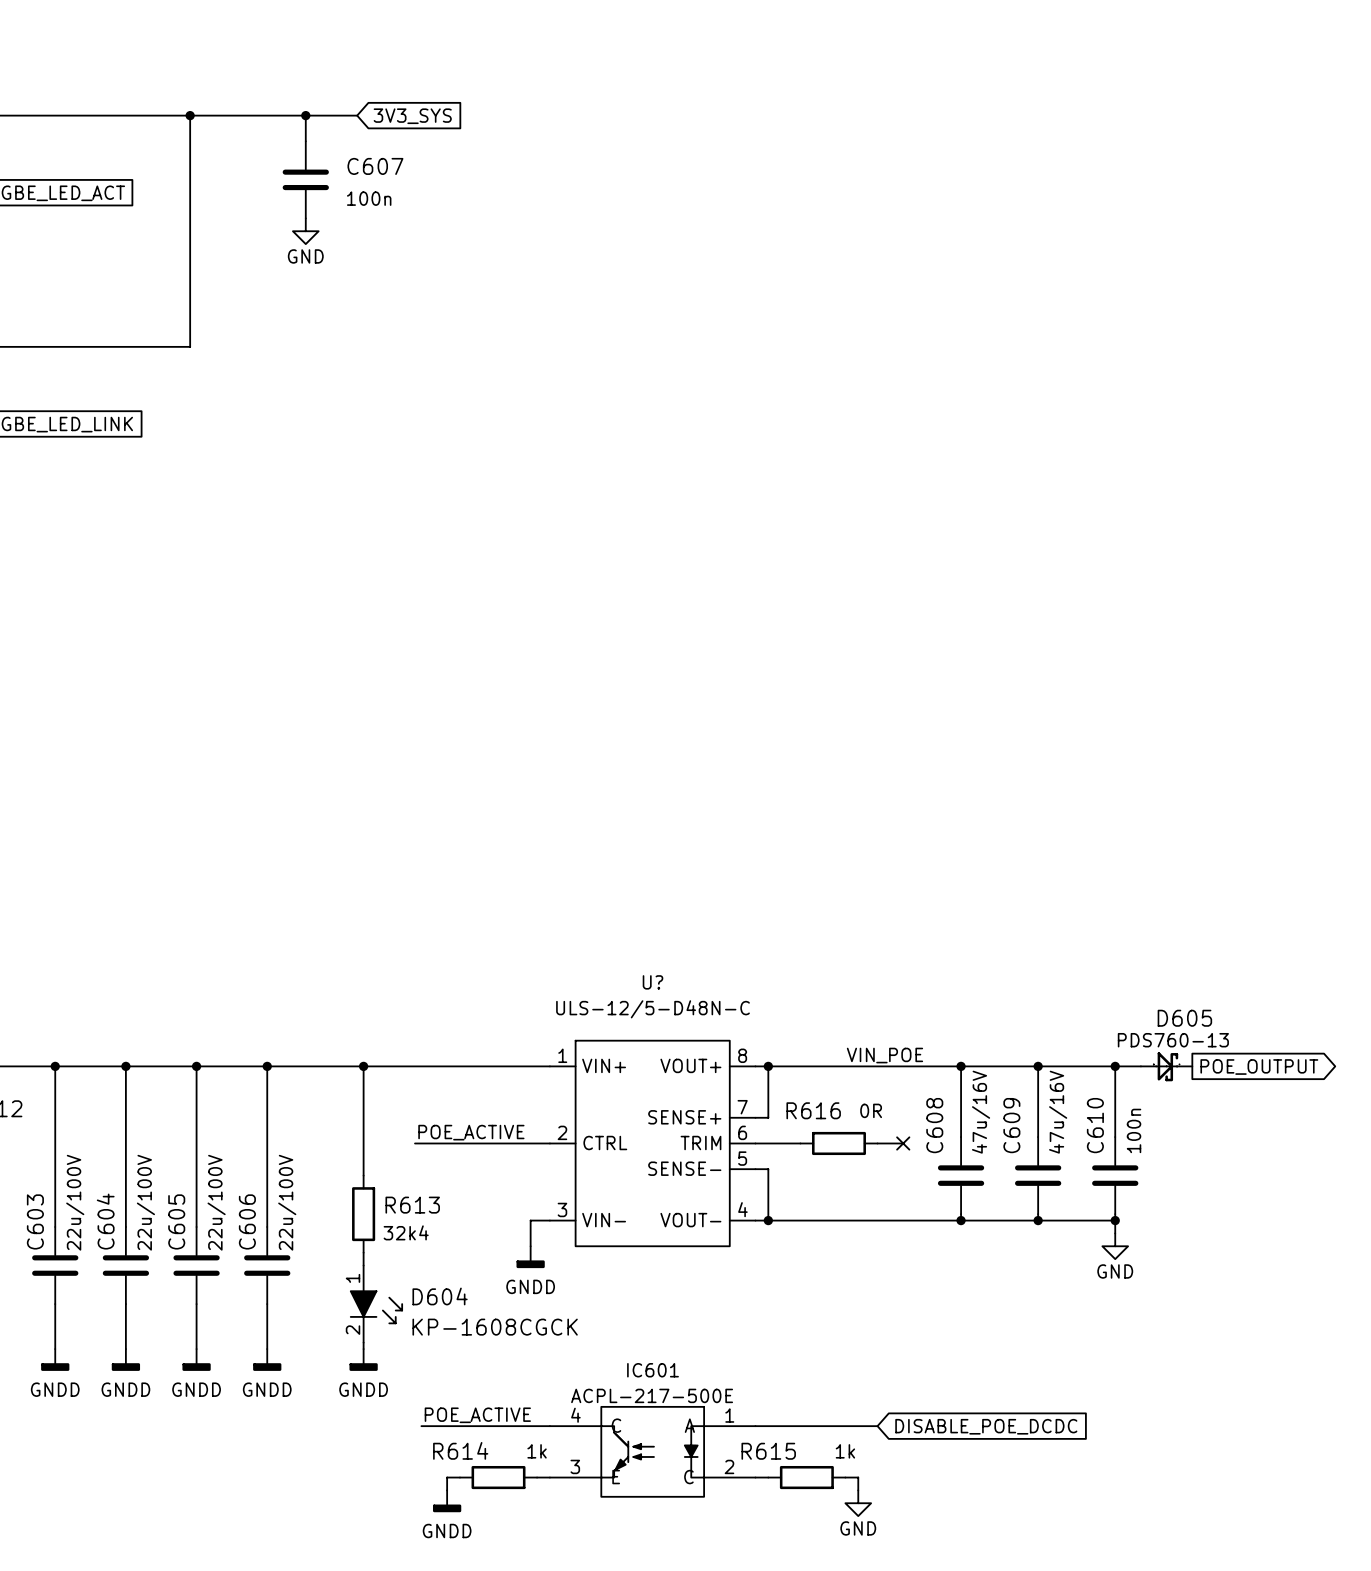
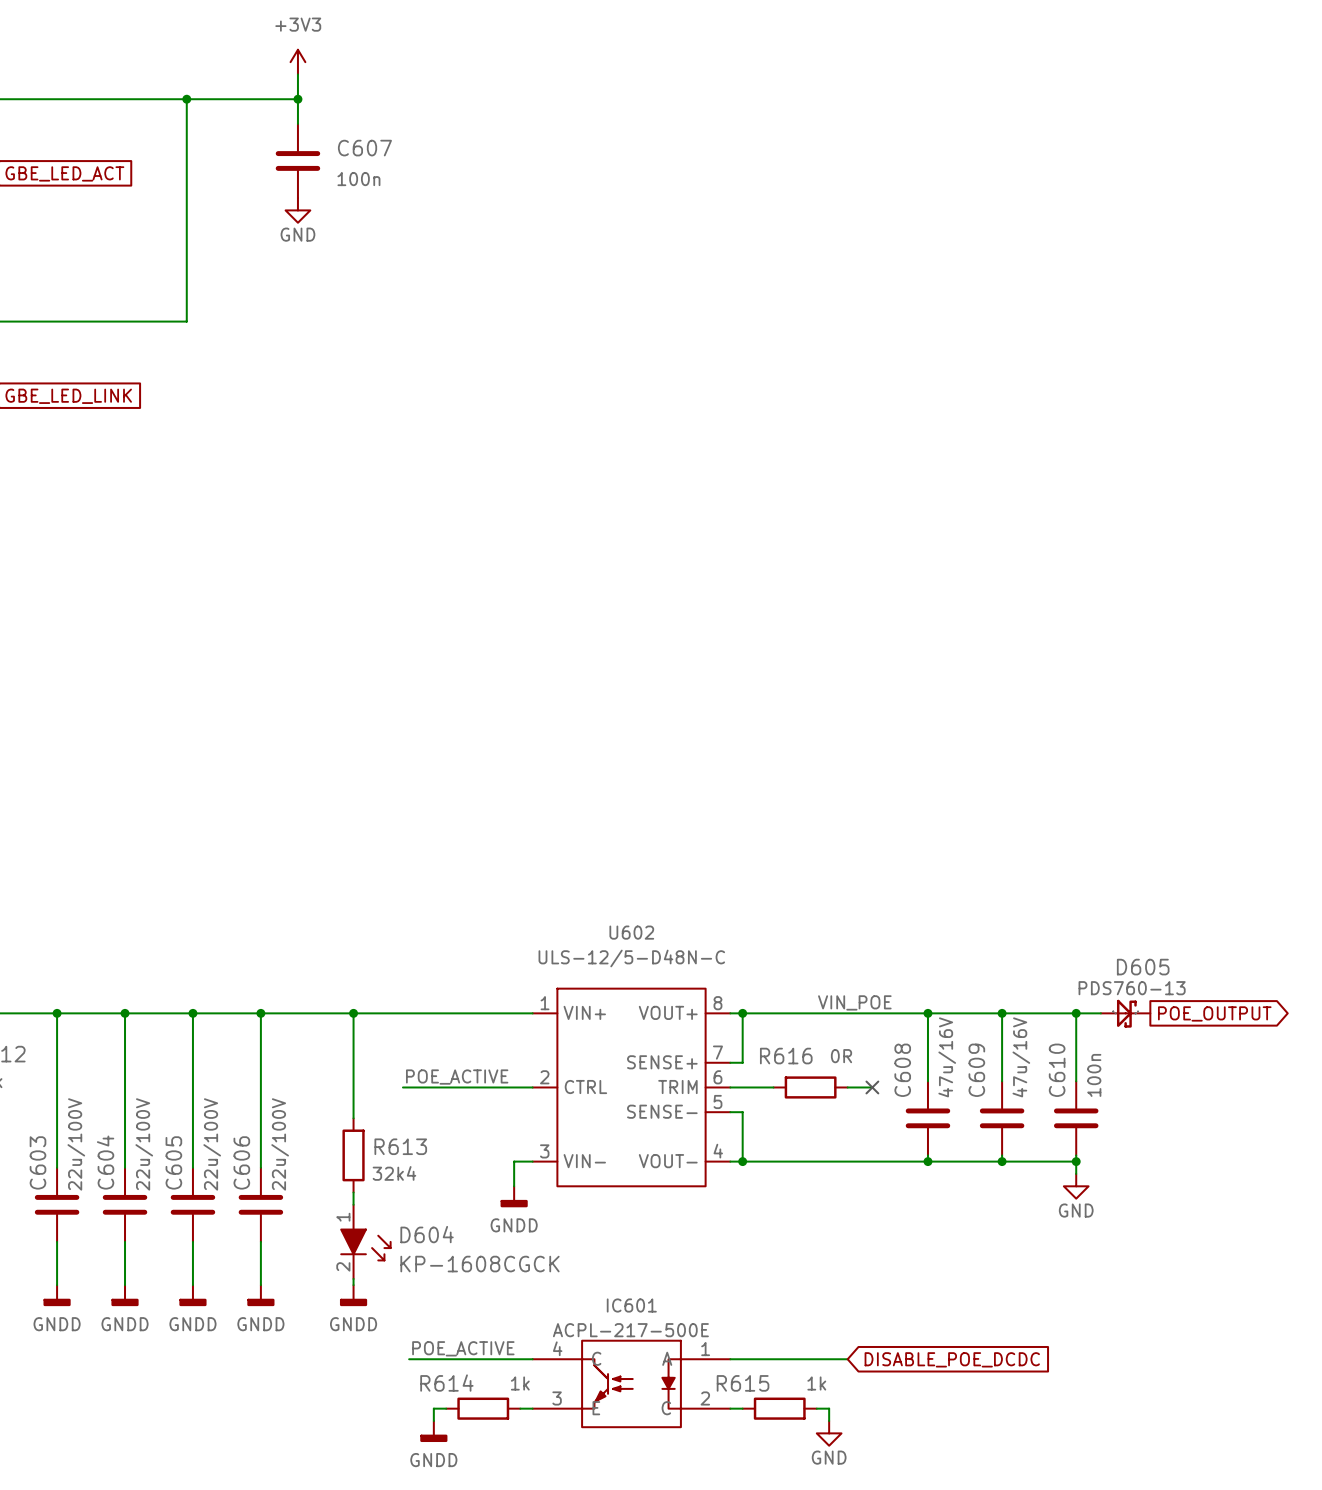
power symbol: none -> +3V3 (297, 62)
wire: (305, 115) (357, 115) -> (297, 99) (297, 74)
global label: 3V3_SYS (412, 116) -> none
U? name: U? (653, 982) -> U602 (631, 932)

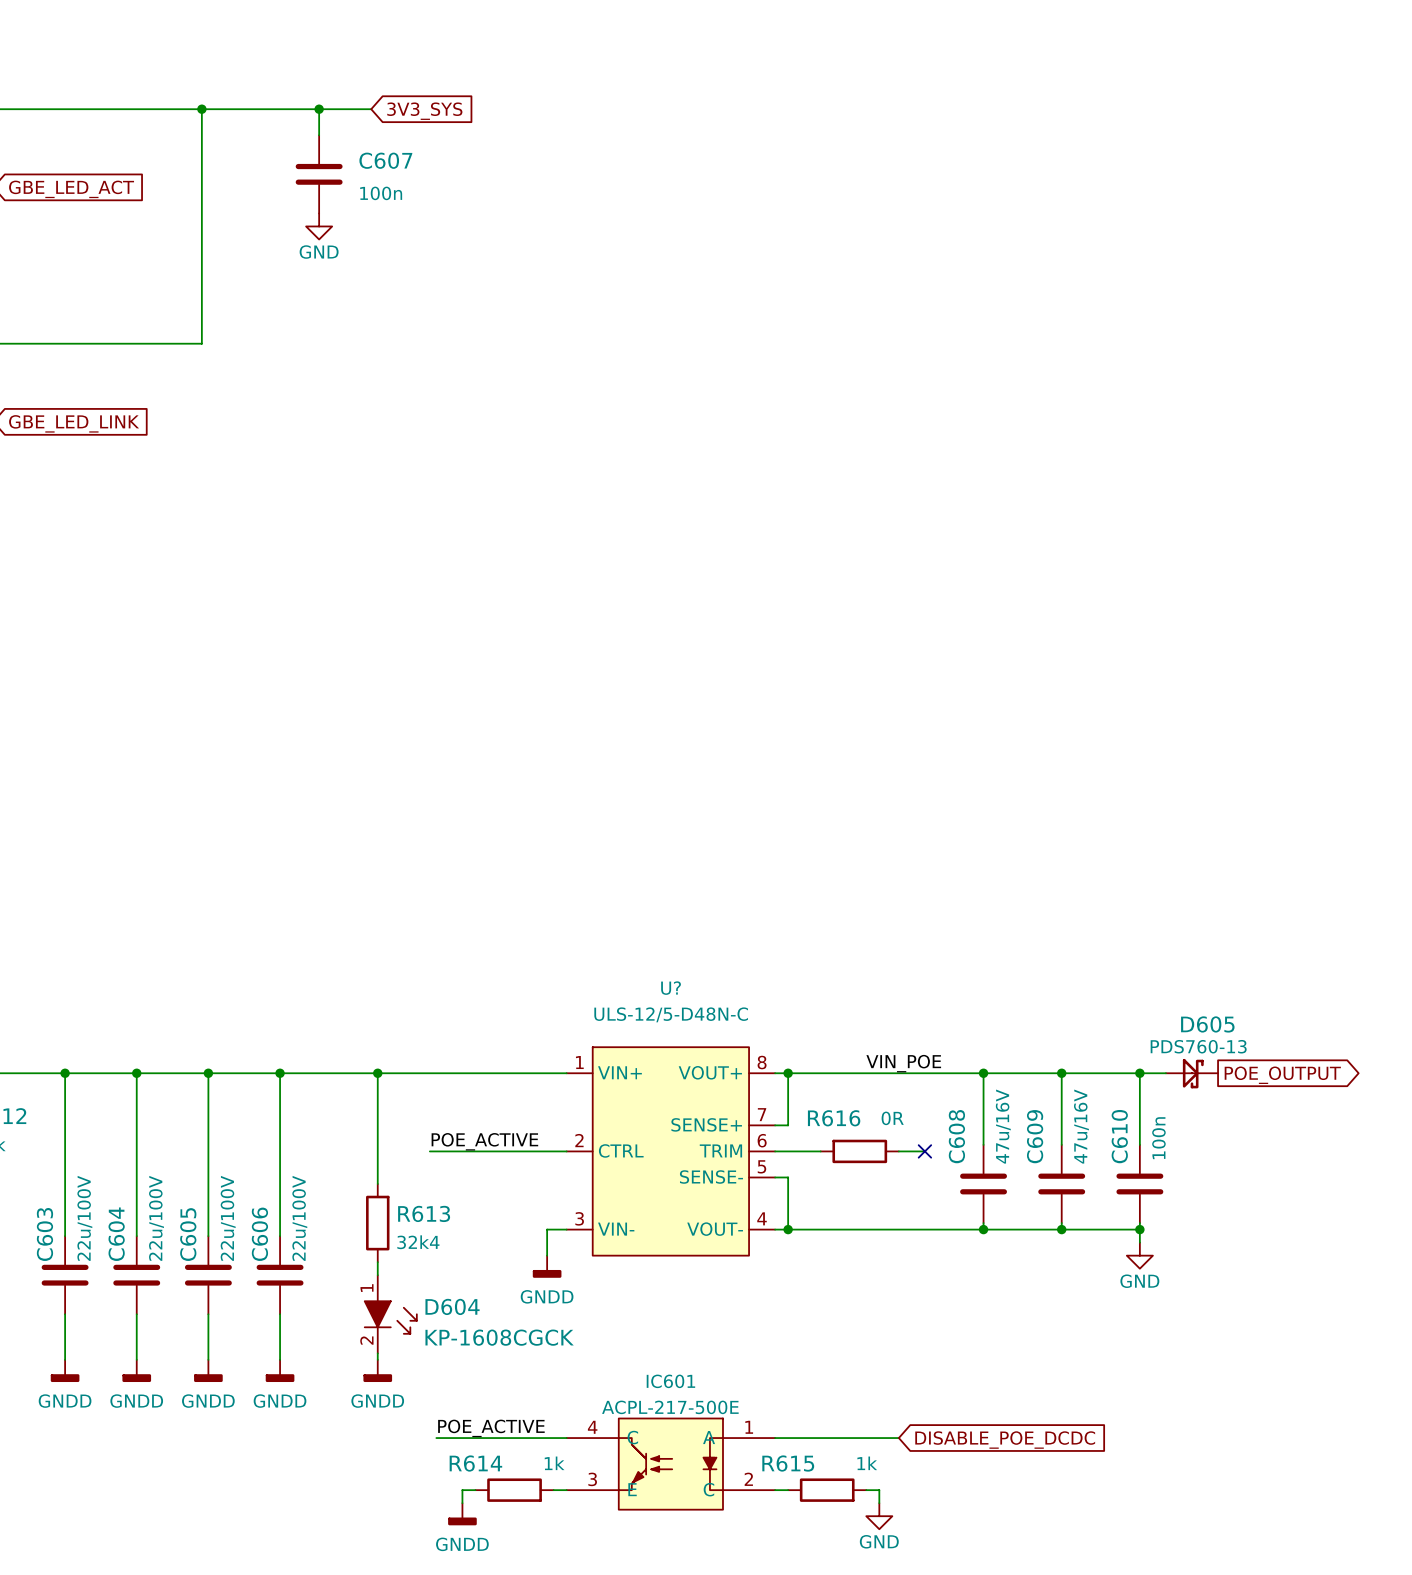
power symbol: +3V3 (297, 62) -> none
wire: (297, 74) (297, 99) -> (371, 109) (319, 109)
global label: none -> 3V3_SYS (424, 111)
U602 name: U602 (631, 932) -> U? (671, 988)

